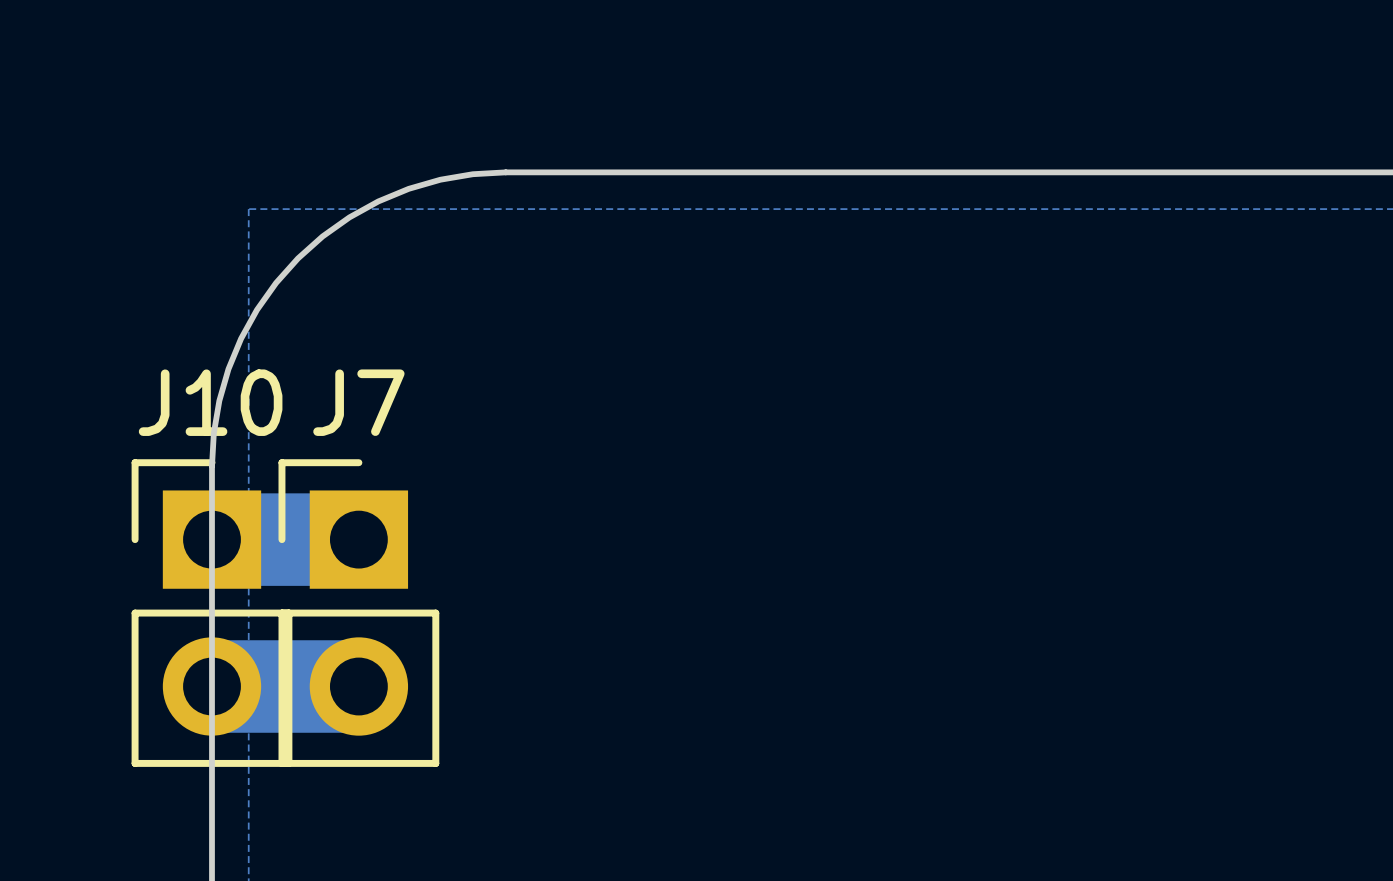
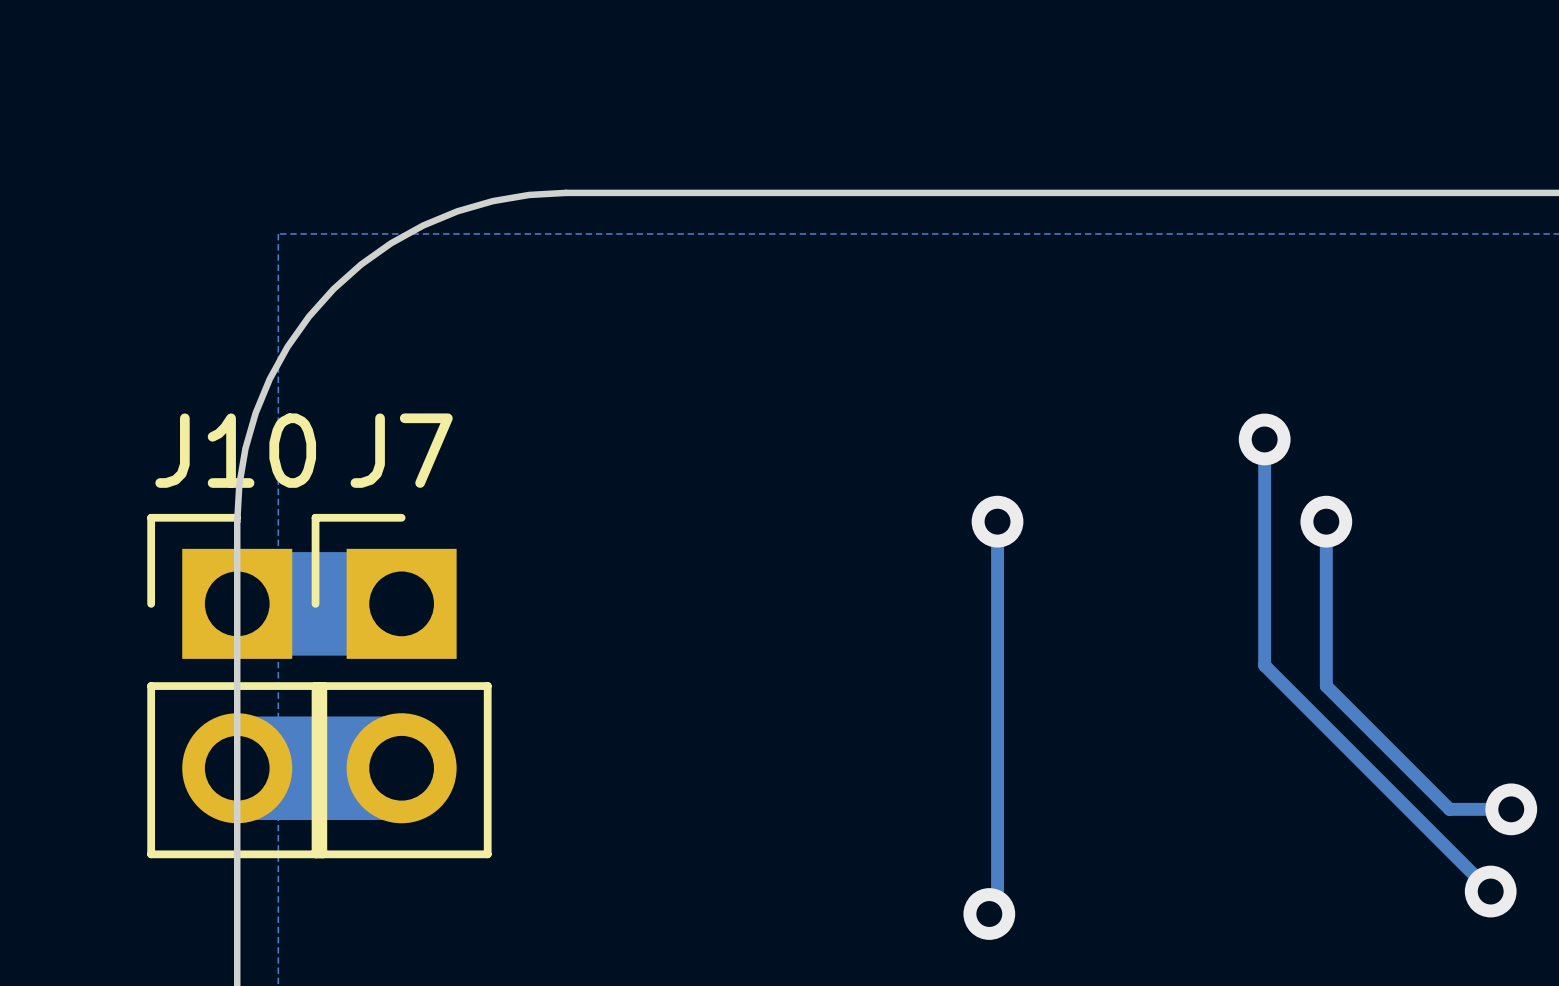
track: none -> (1264, 439) (1264, 665) (1490, 891)
via: none -> (1264, 439)
track: none -> (997, 521) (997, 905) (989, 914)
via: none -> (997, 521)
track: none -> (1326, 521) (1326, 686) (1449, 809) (1511, 809)
via: none -> (1326, 521)
via: none -> (1511, 809)
via: none -> (1490, 891)
via: none -> (989, 914)

